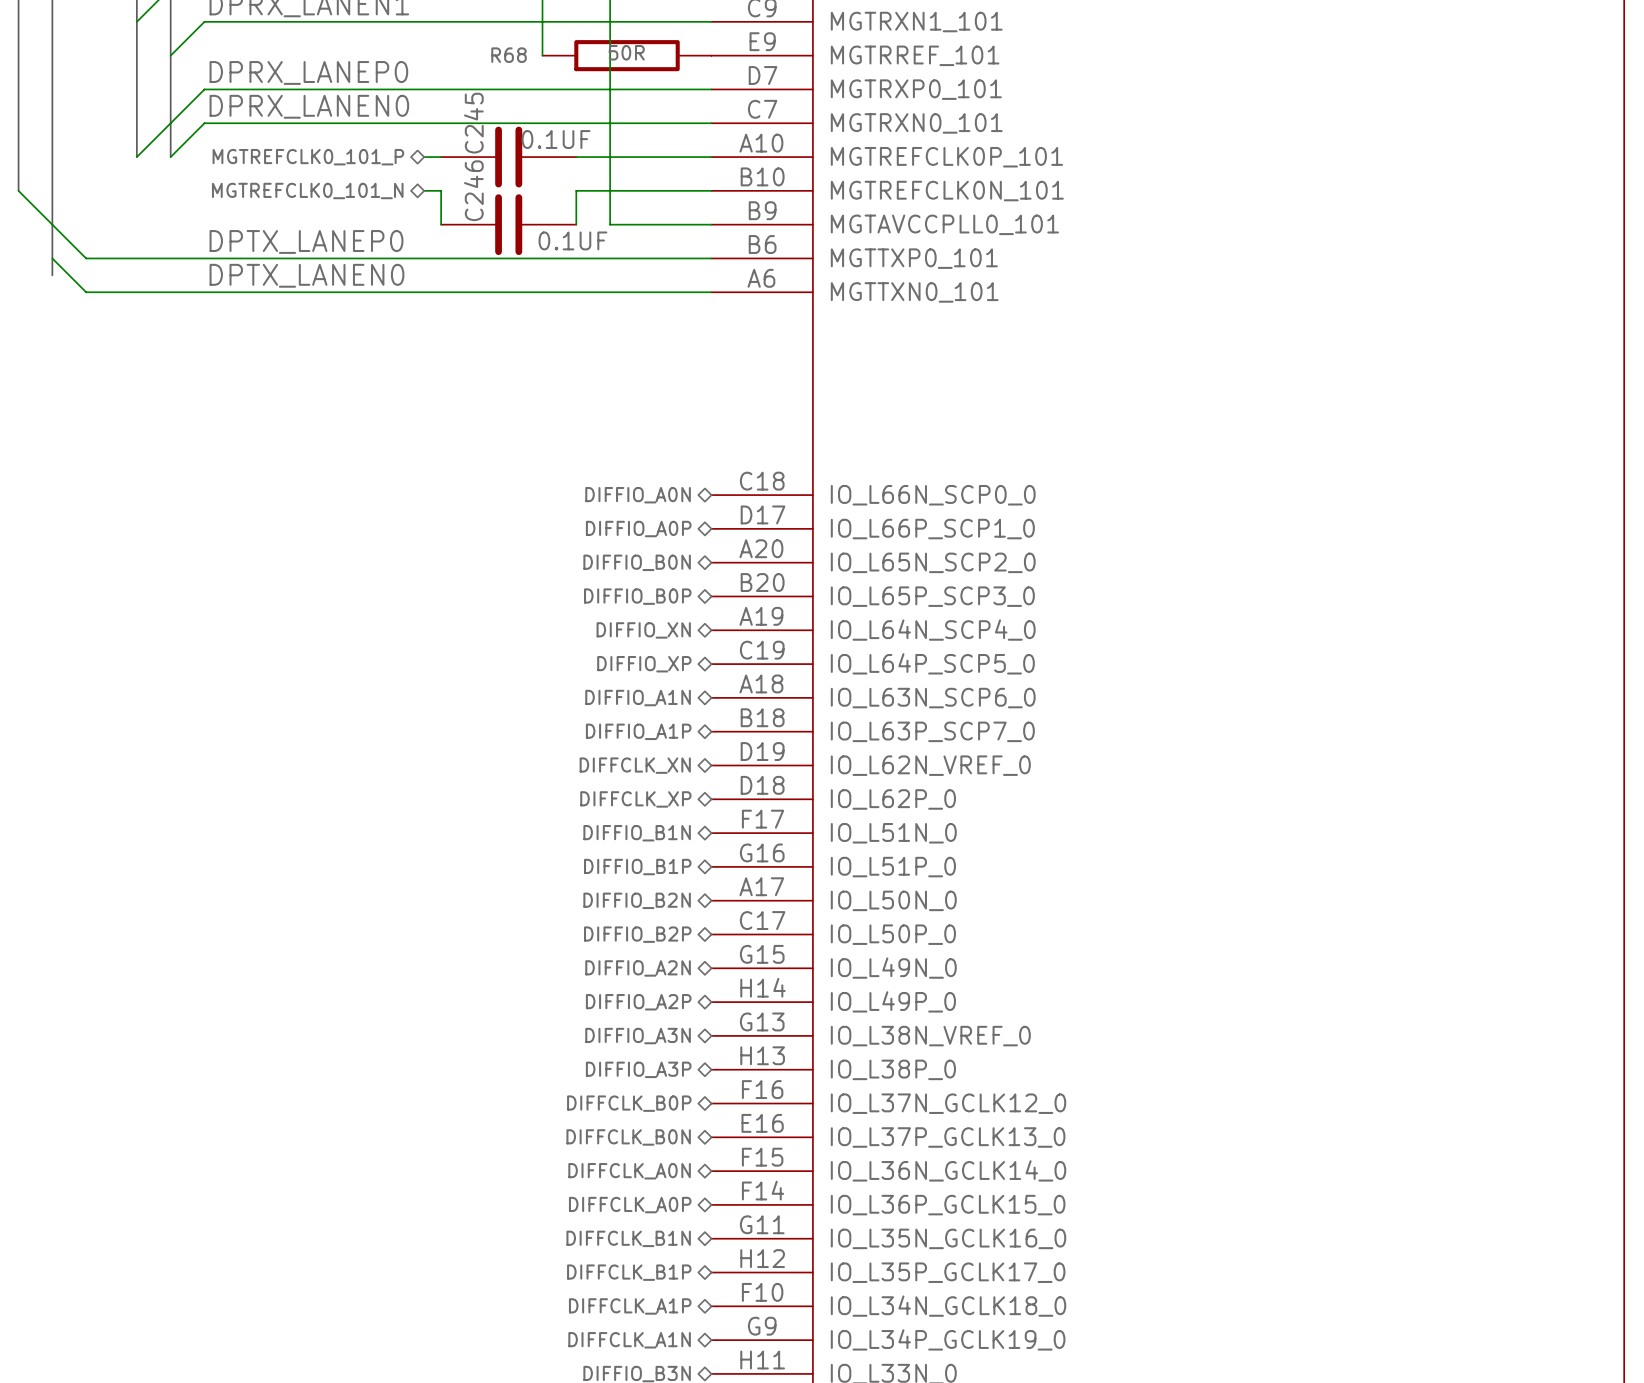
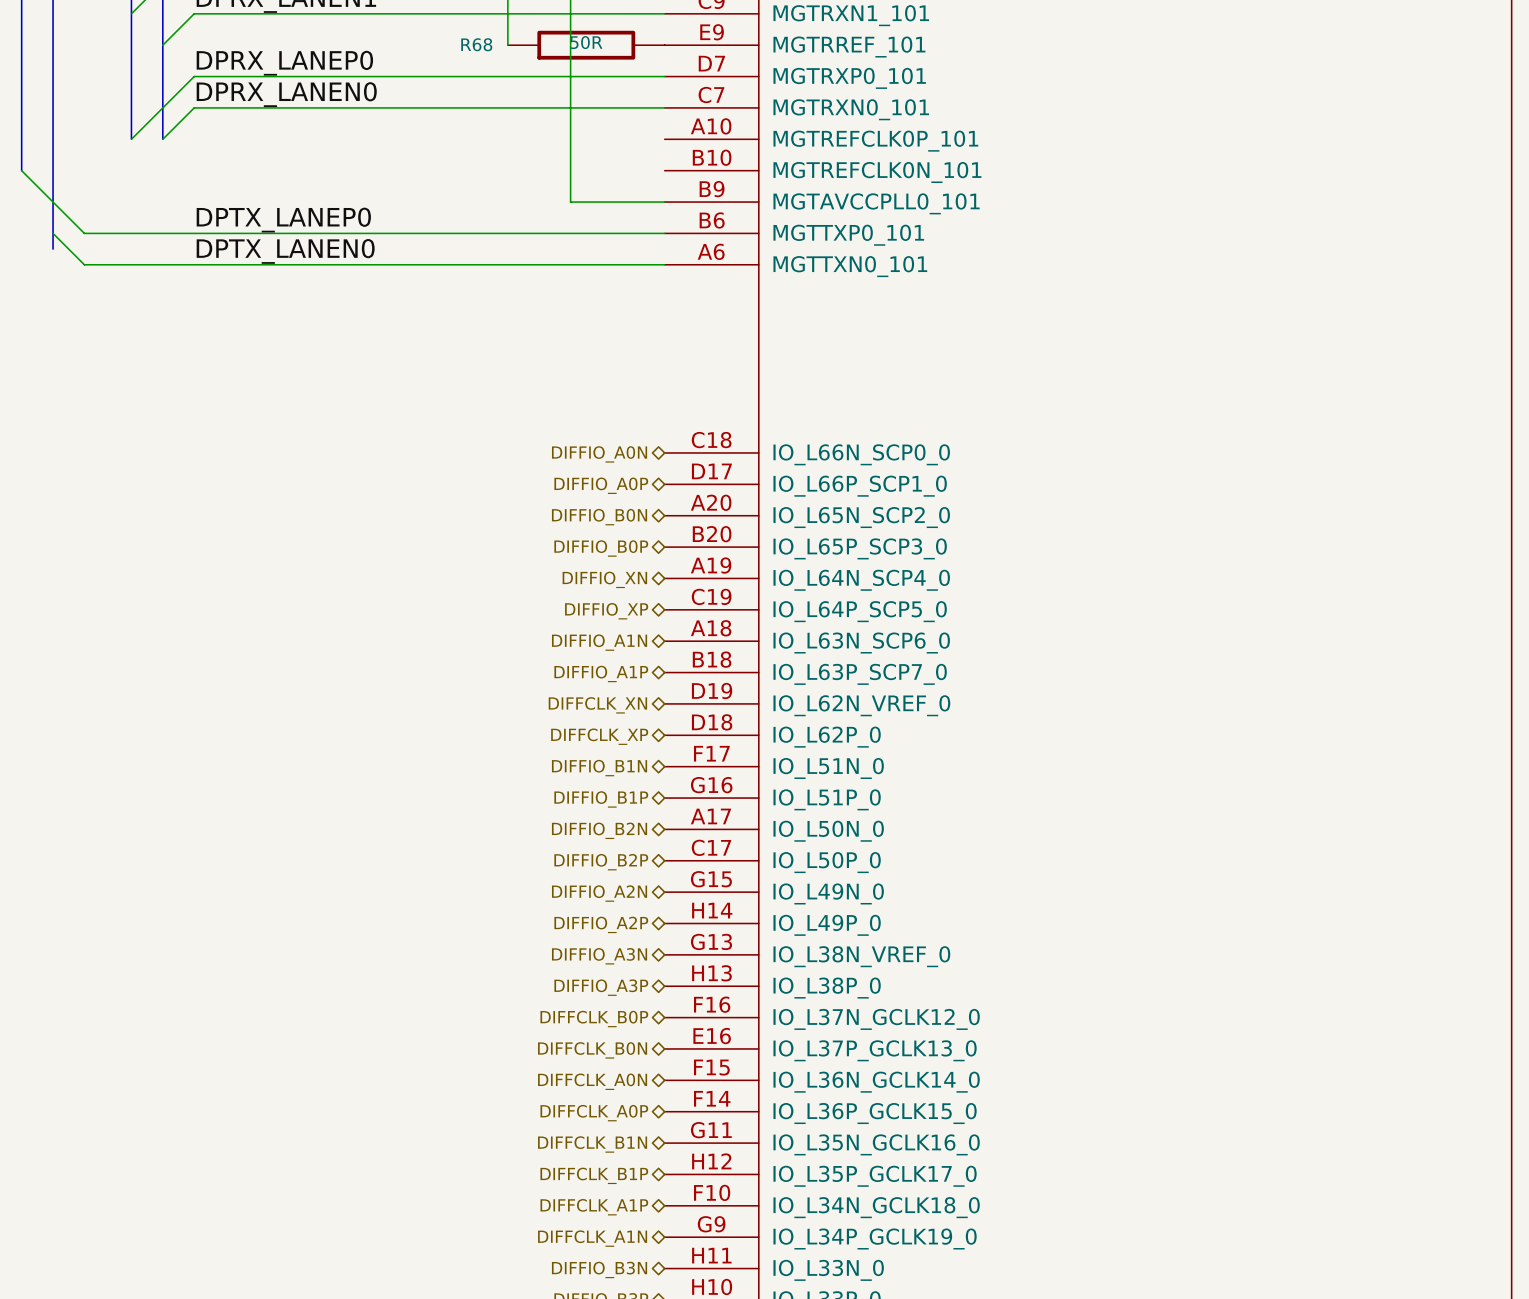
hierarchical label: MGTREFCLK0_101_P (308, 157) -> none
wire: (424, 157) (441, 157) -> none
C245: 0.1UF (508, 157) -> none
wire: (576, 157) (711, 157) -> none
hierarchical label: MGTREFCLK0_101_N (307, 190) -> none
wire: (424, 190) (441, 190) (441, 224) -> none
wire: (711, 190) (576, 190) (576, 224) -> none
C246: 0.1UF (508, 224) -> none

